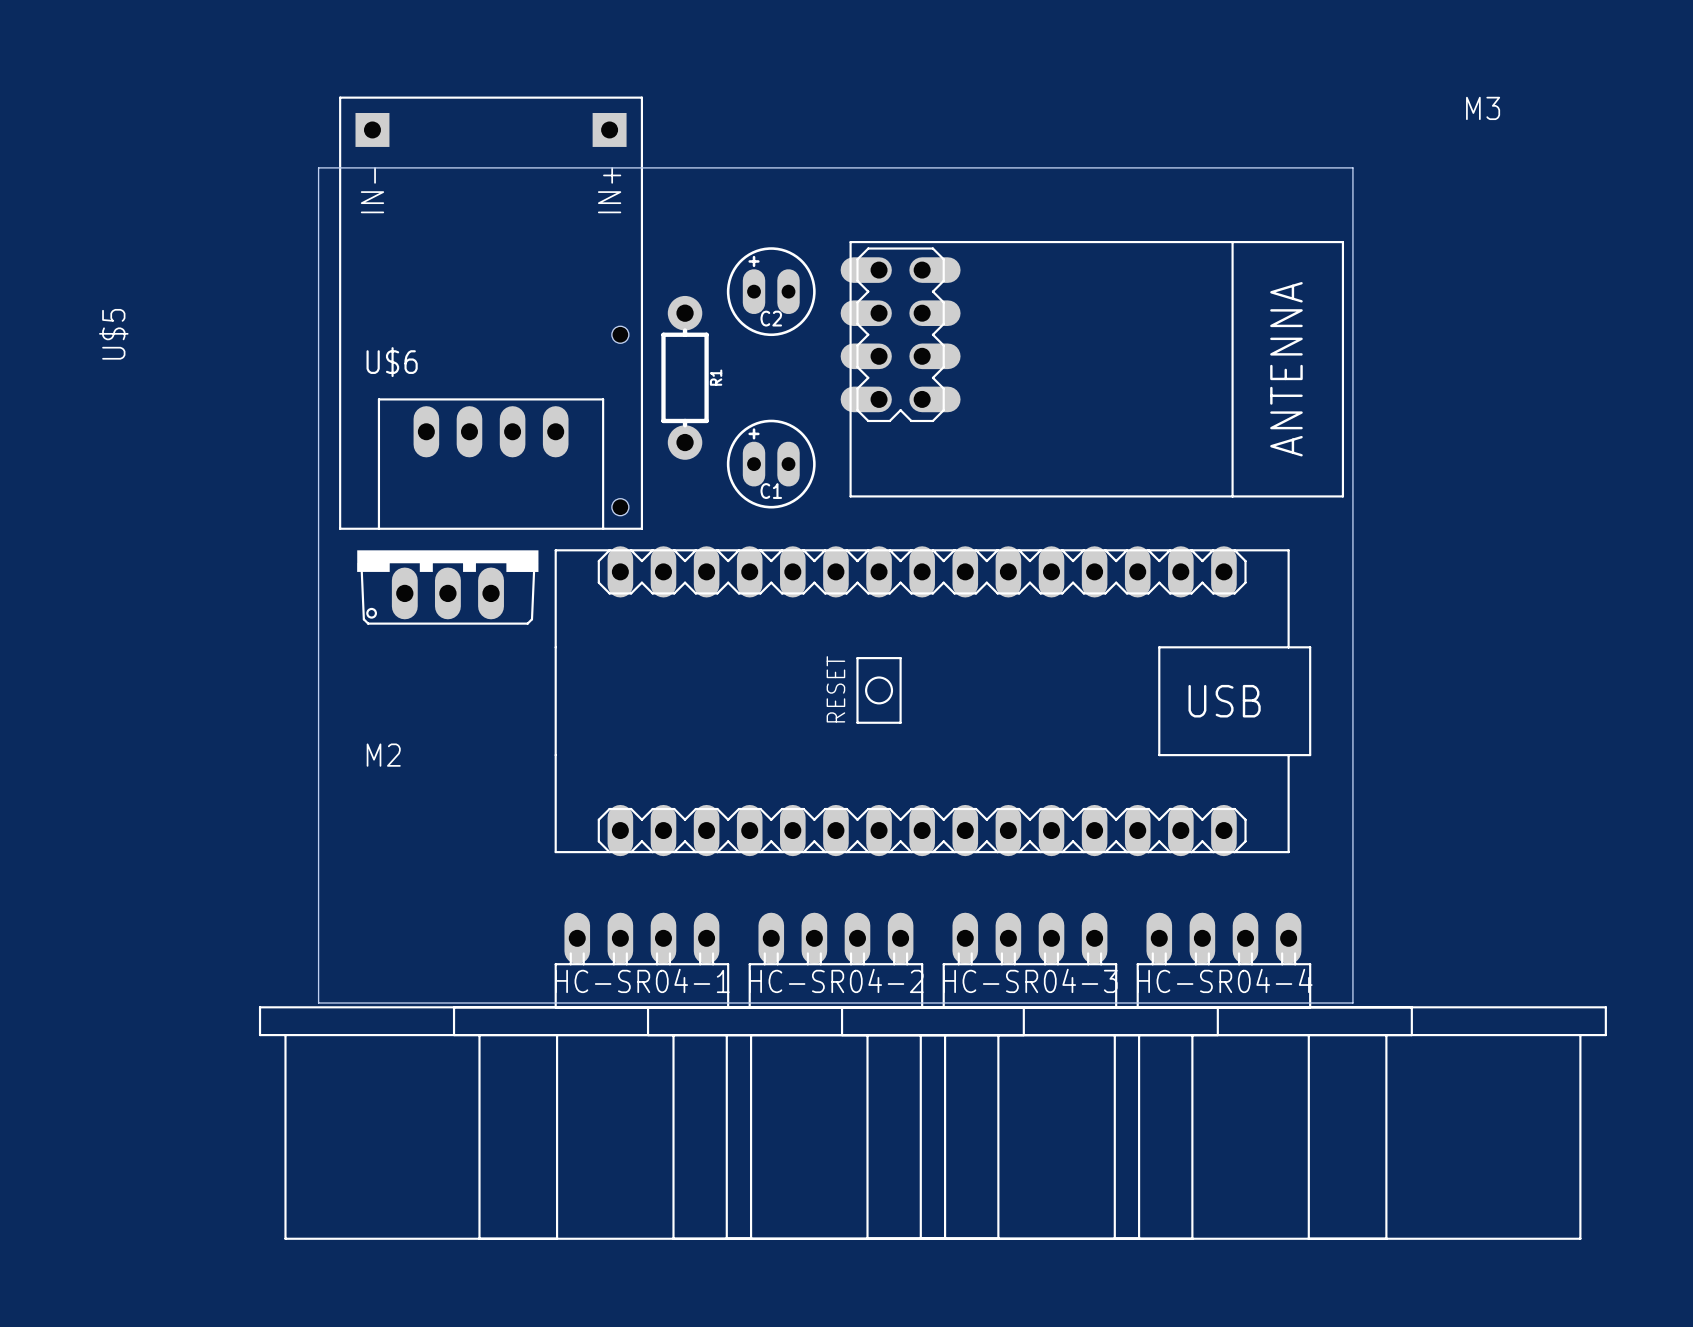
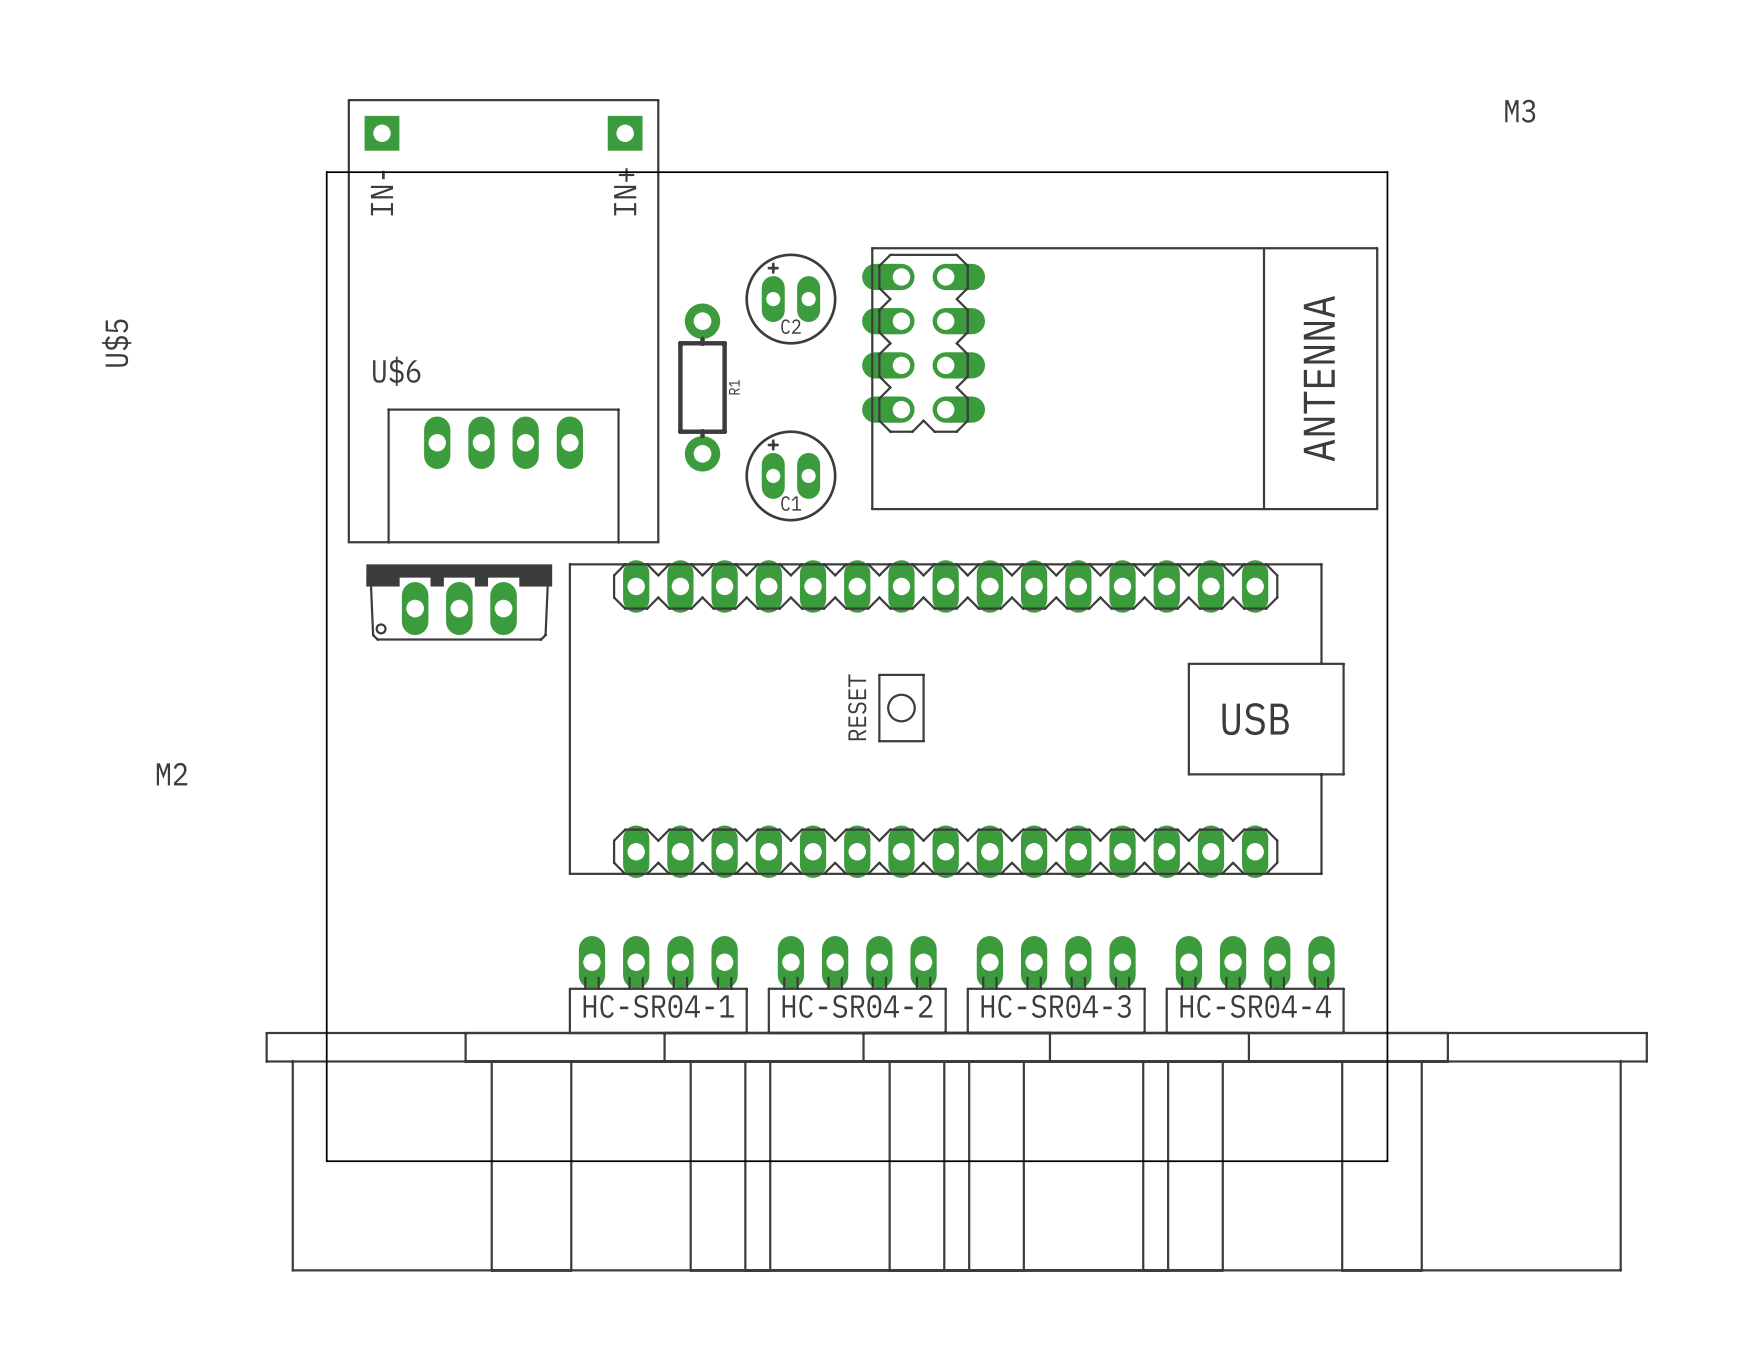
hole: (620, 334) -> none
hole: (620, 507) -> none
M2 name position: M2 (383, 755) -> M2 (172, 774)
board edge: (318, 1003) (1352, 1003) -> (326, 1028) (326, 1161) (1387, 1161) (1387, 1028)

